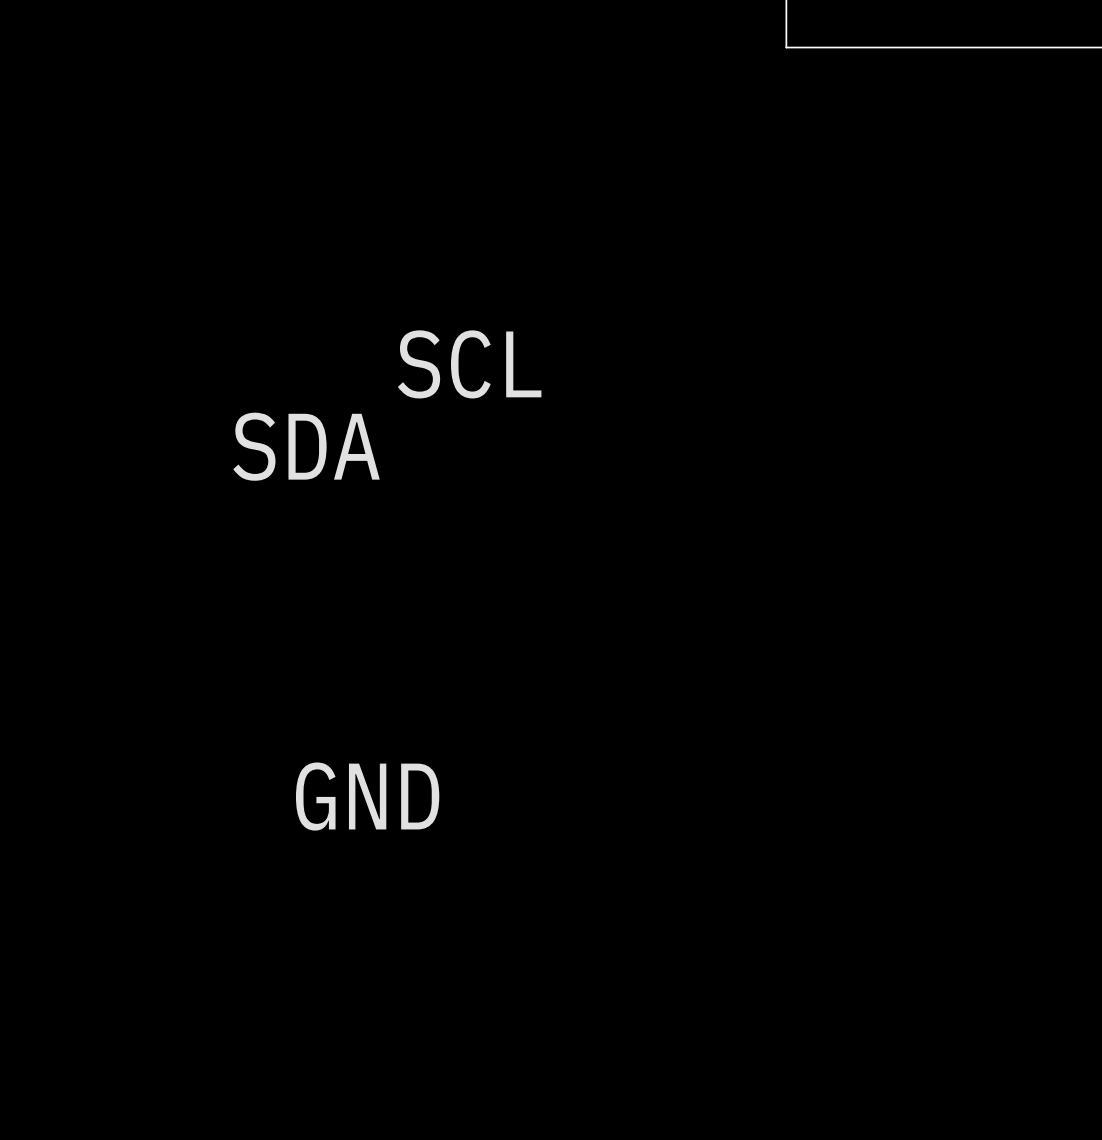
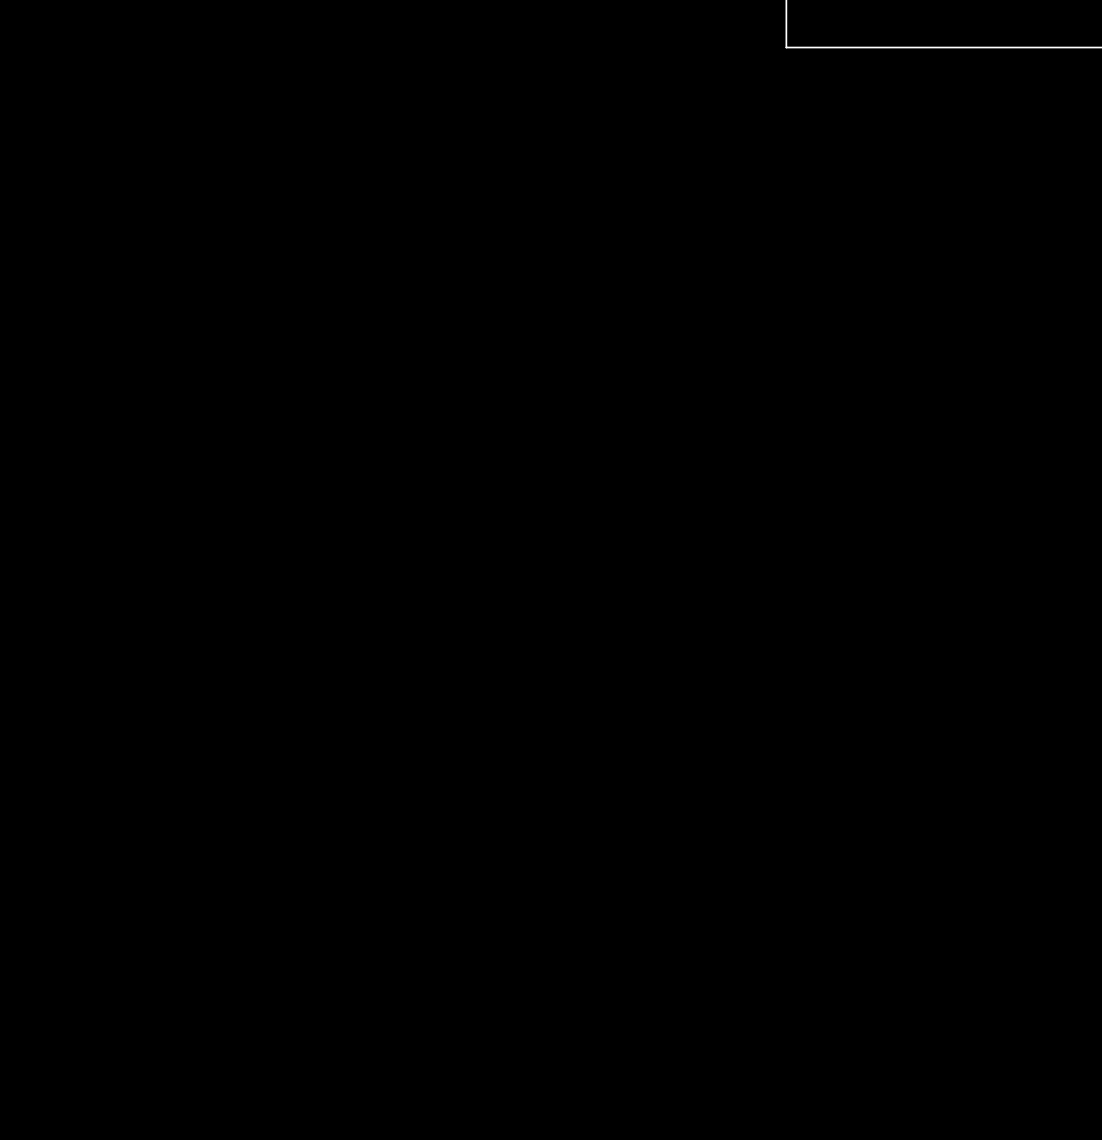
text: SCL (469, 364) -> none
text: SDA (306, 446) -> none
text: GND (367, 796) -> none

